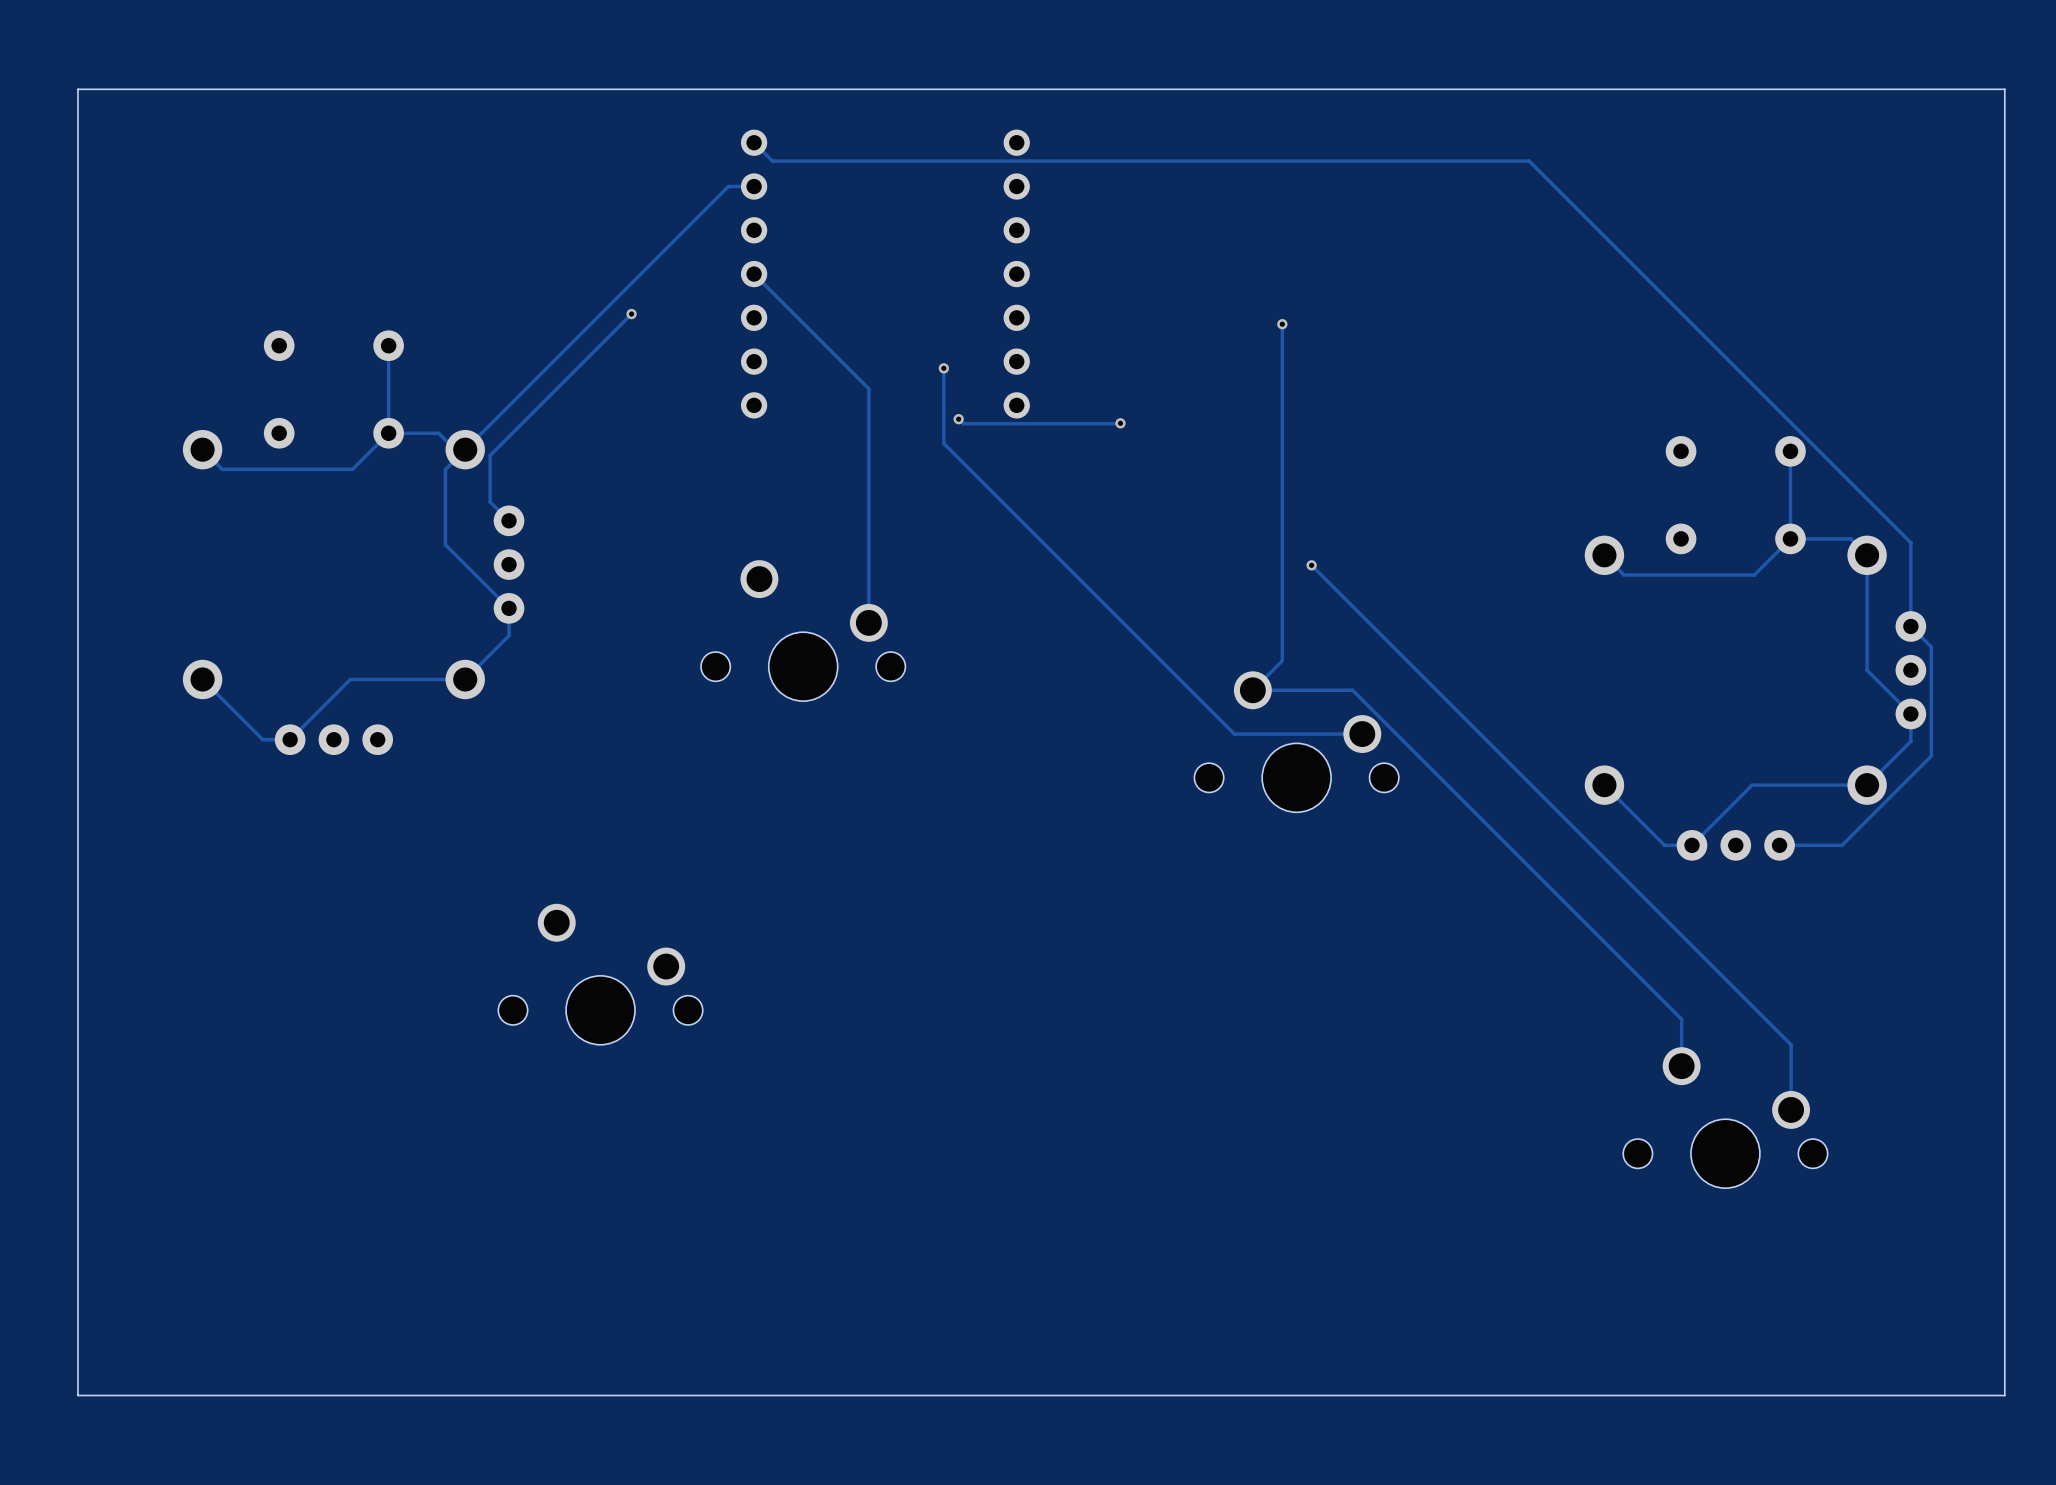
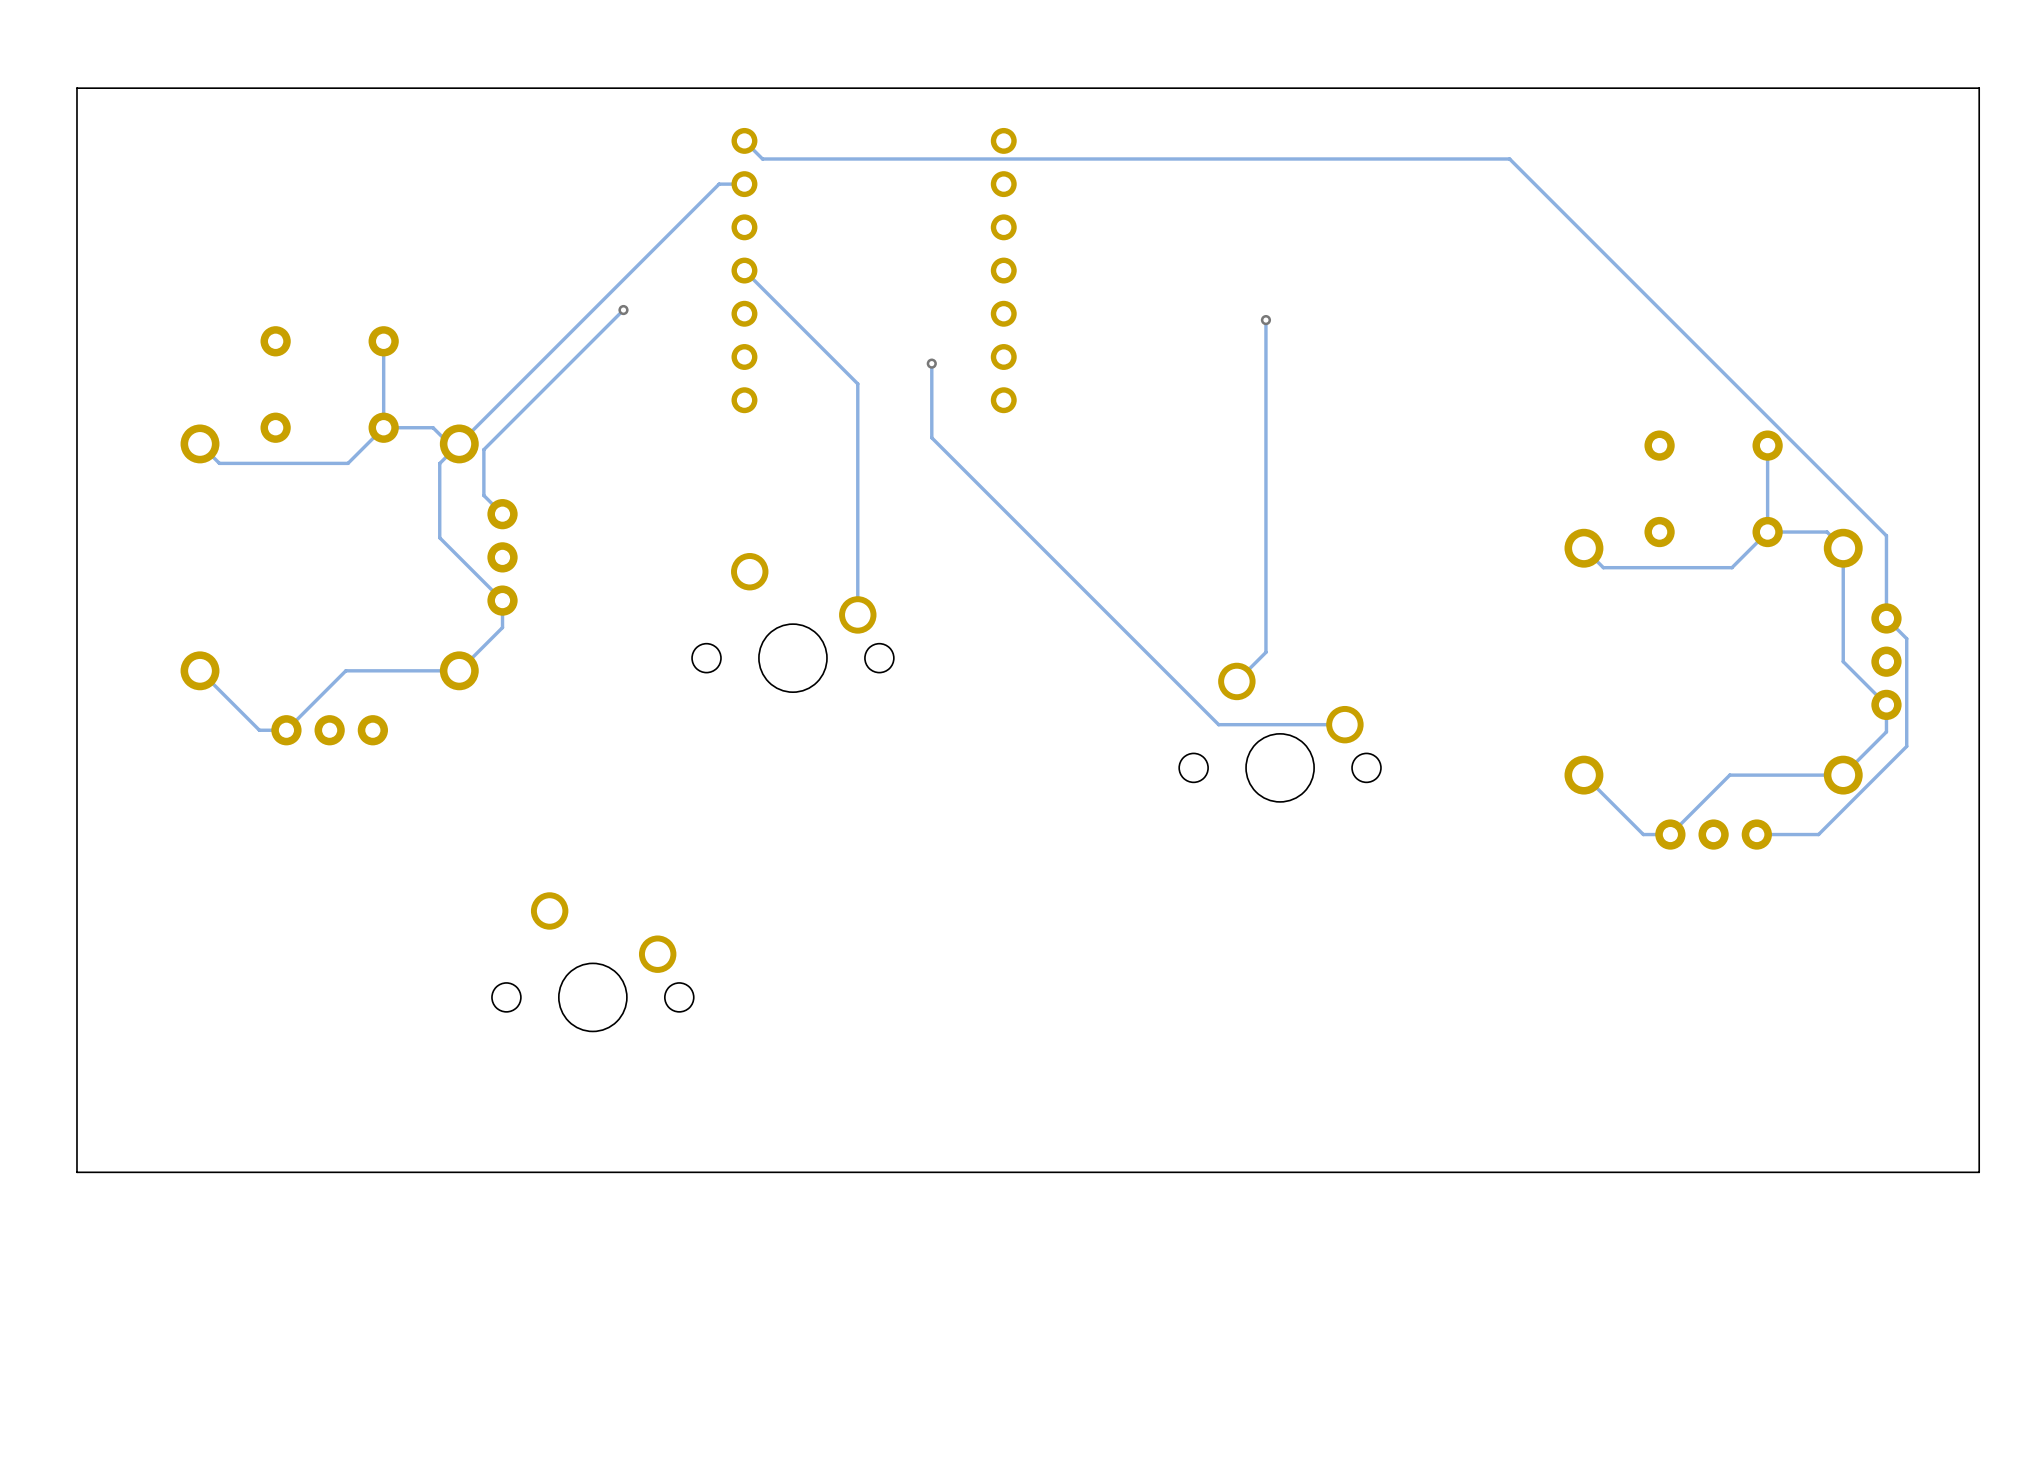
track: (958, 419) (963, 423) (1120, 423) -> none
via: (958, 419) -> none
via: (1120, 423) -> none
track: (1311, 565) (1791, 1044) (1791, 1109) -> none
via: (1311, 565) -> none
track: (1252, 690) (1352, 690) (1681, 1019) (1681, 1066) -> none
part: (1725, 1117) -> none
board edge: (2004, 1187) (2004, 1395) (77, 1395) (77, 1187) -> (1979, 1172) (76, 1172)

